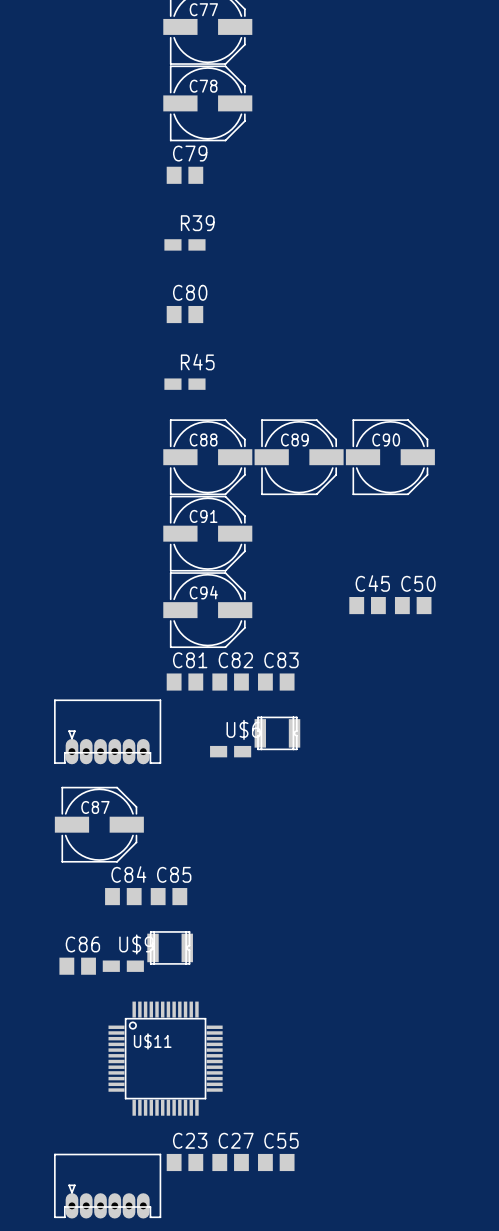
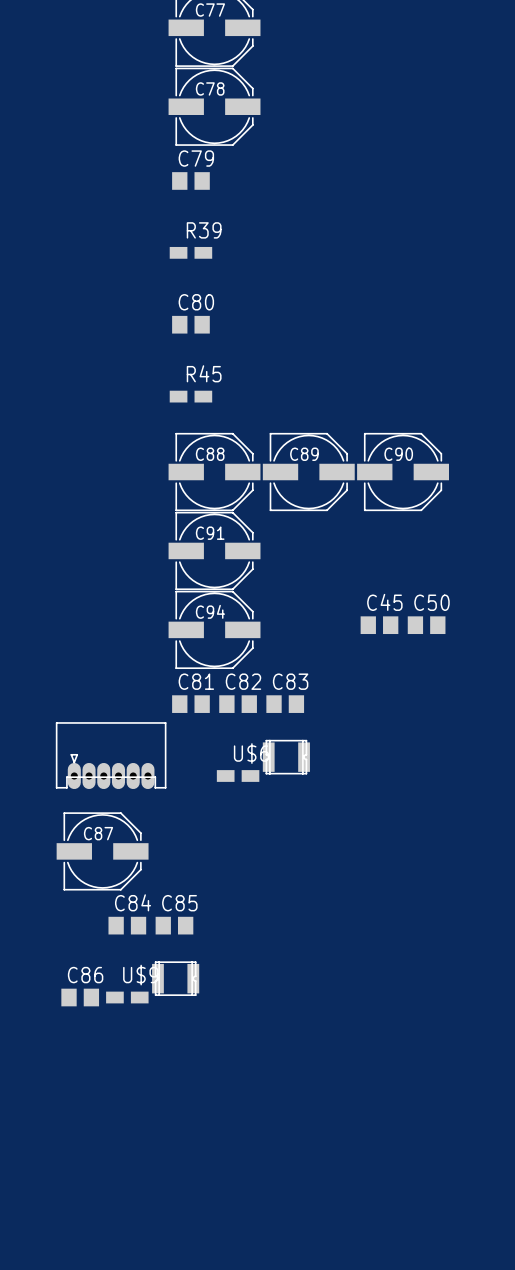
U$11: (165, 1058) -> none
C23: (184, 1162) -> none
C27: (230, 1162) -> none
C55: (276, 1162) -> none
part: (107, 1186) -> none

